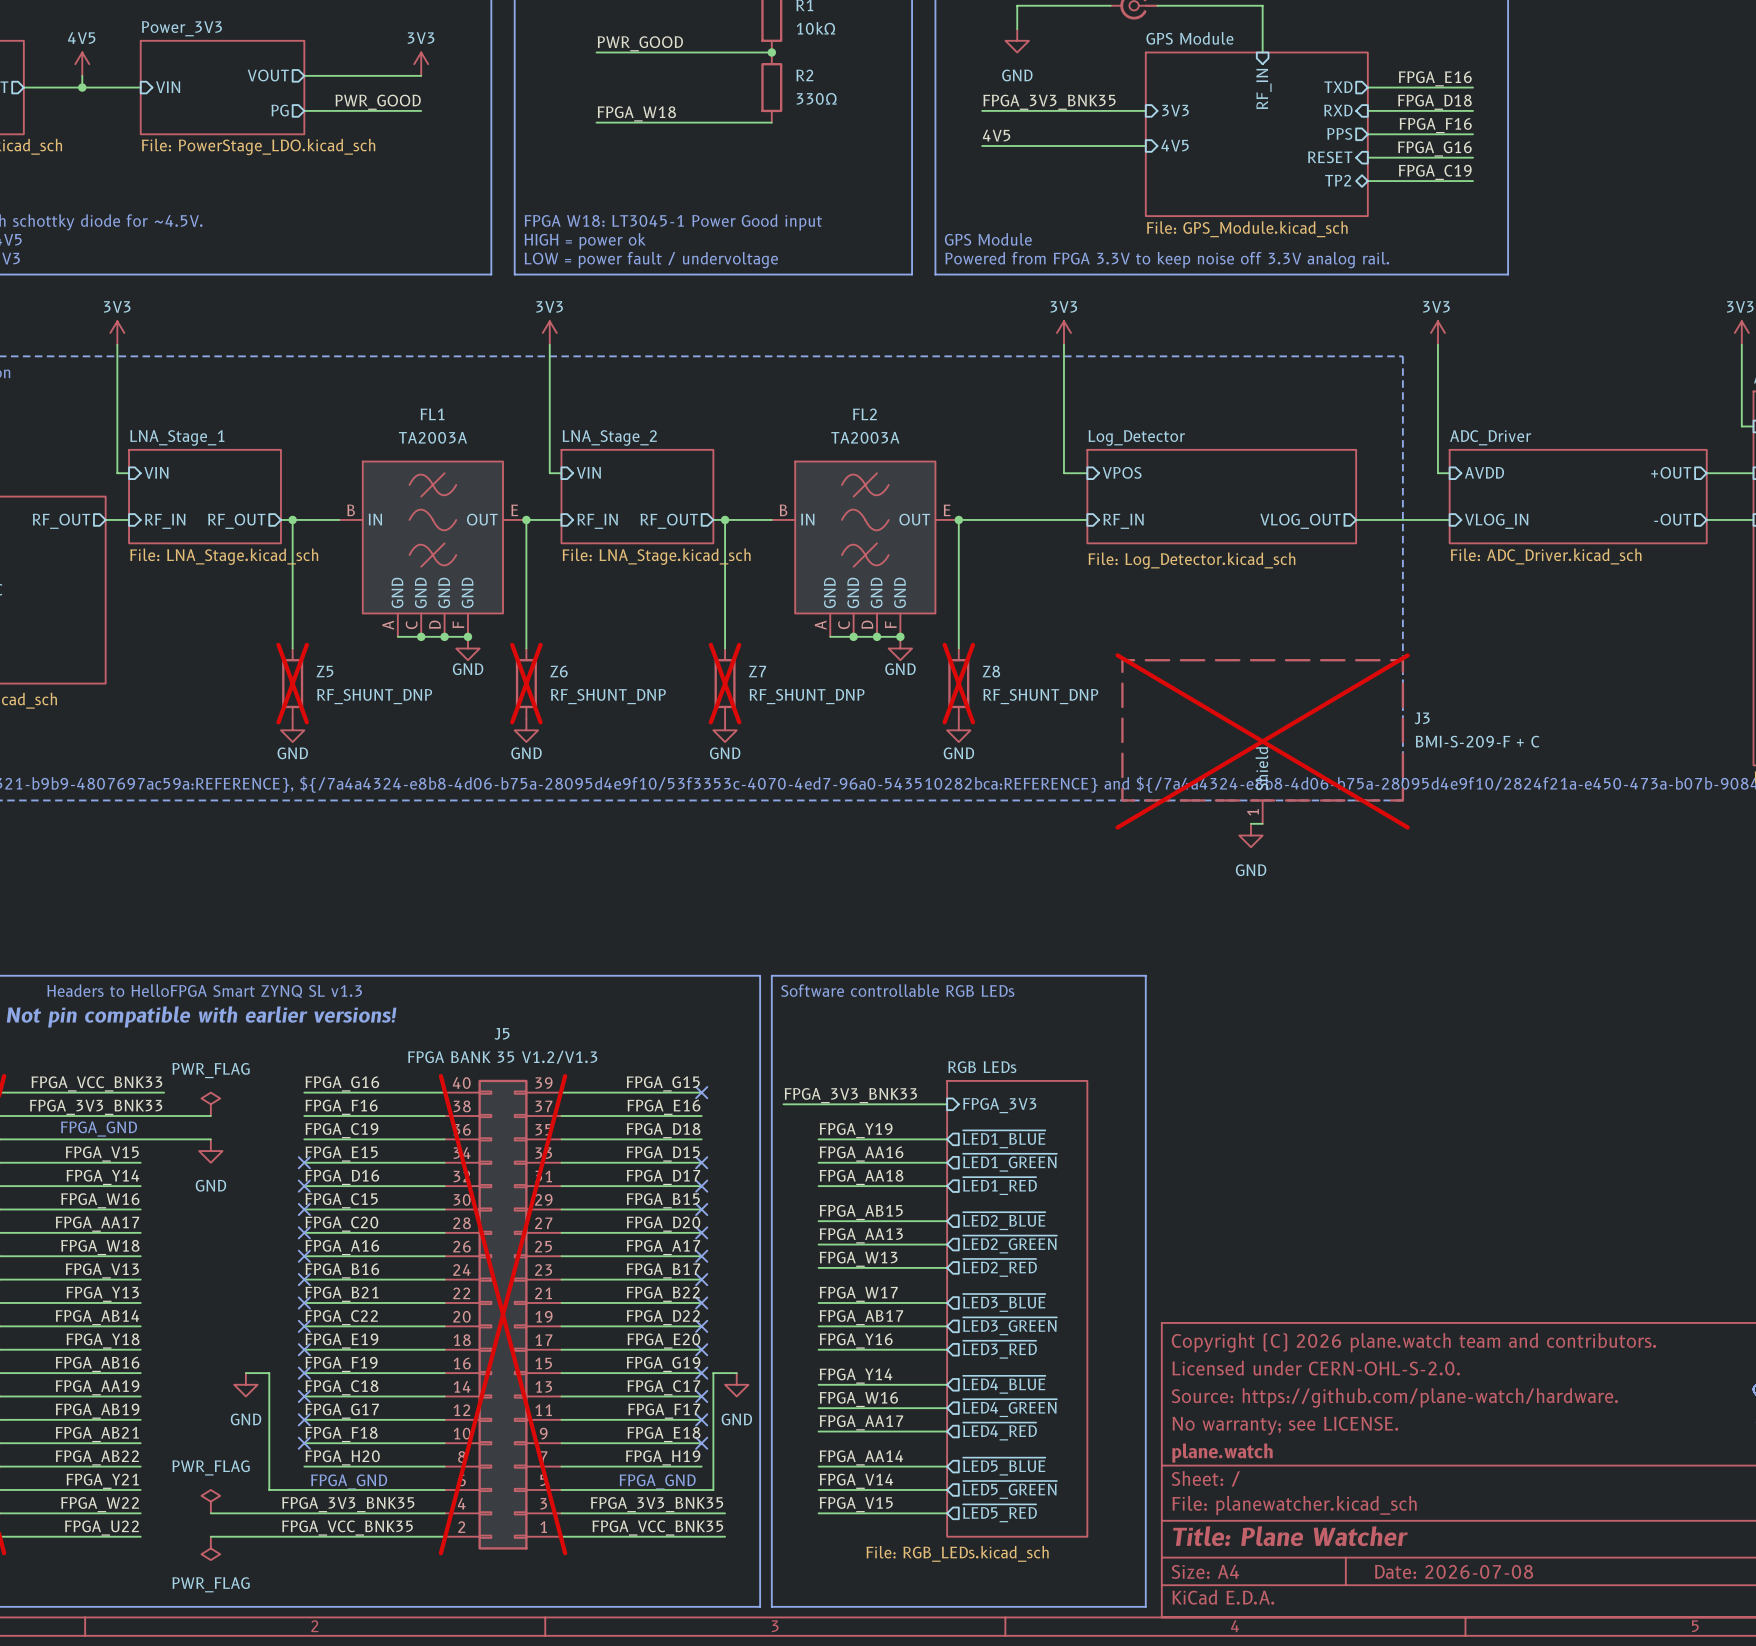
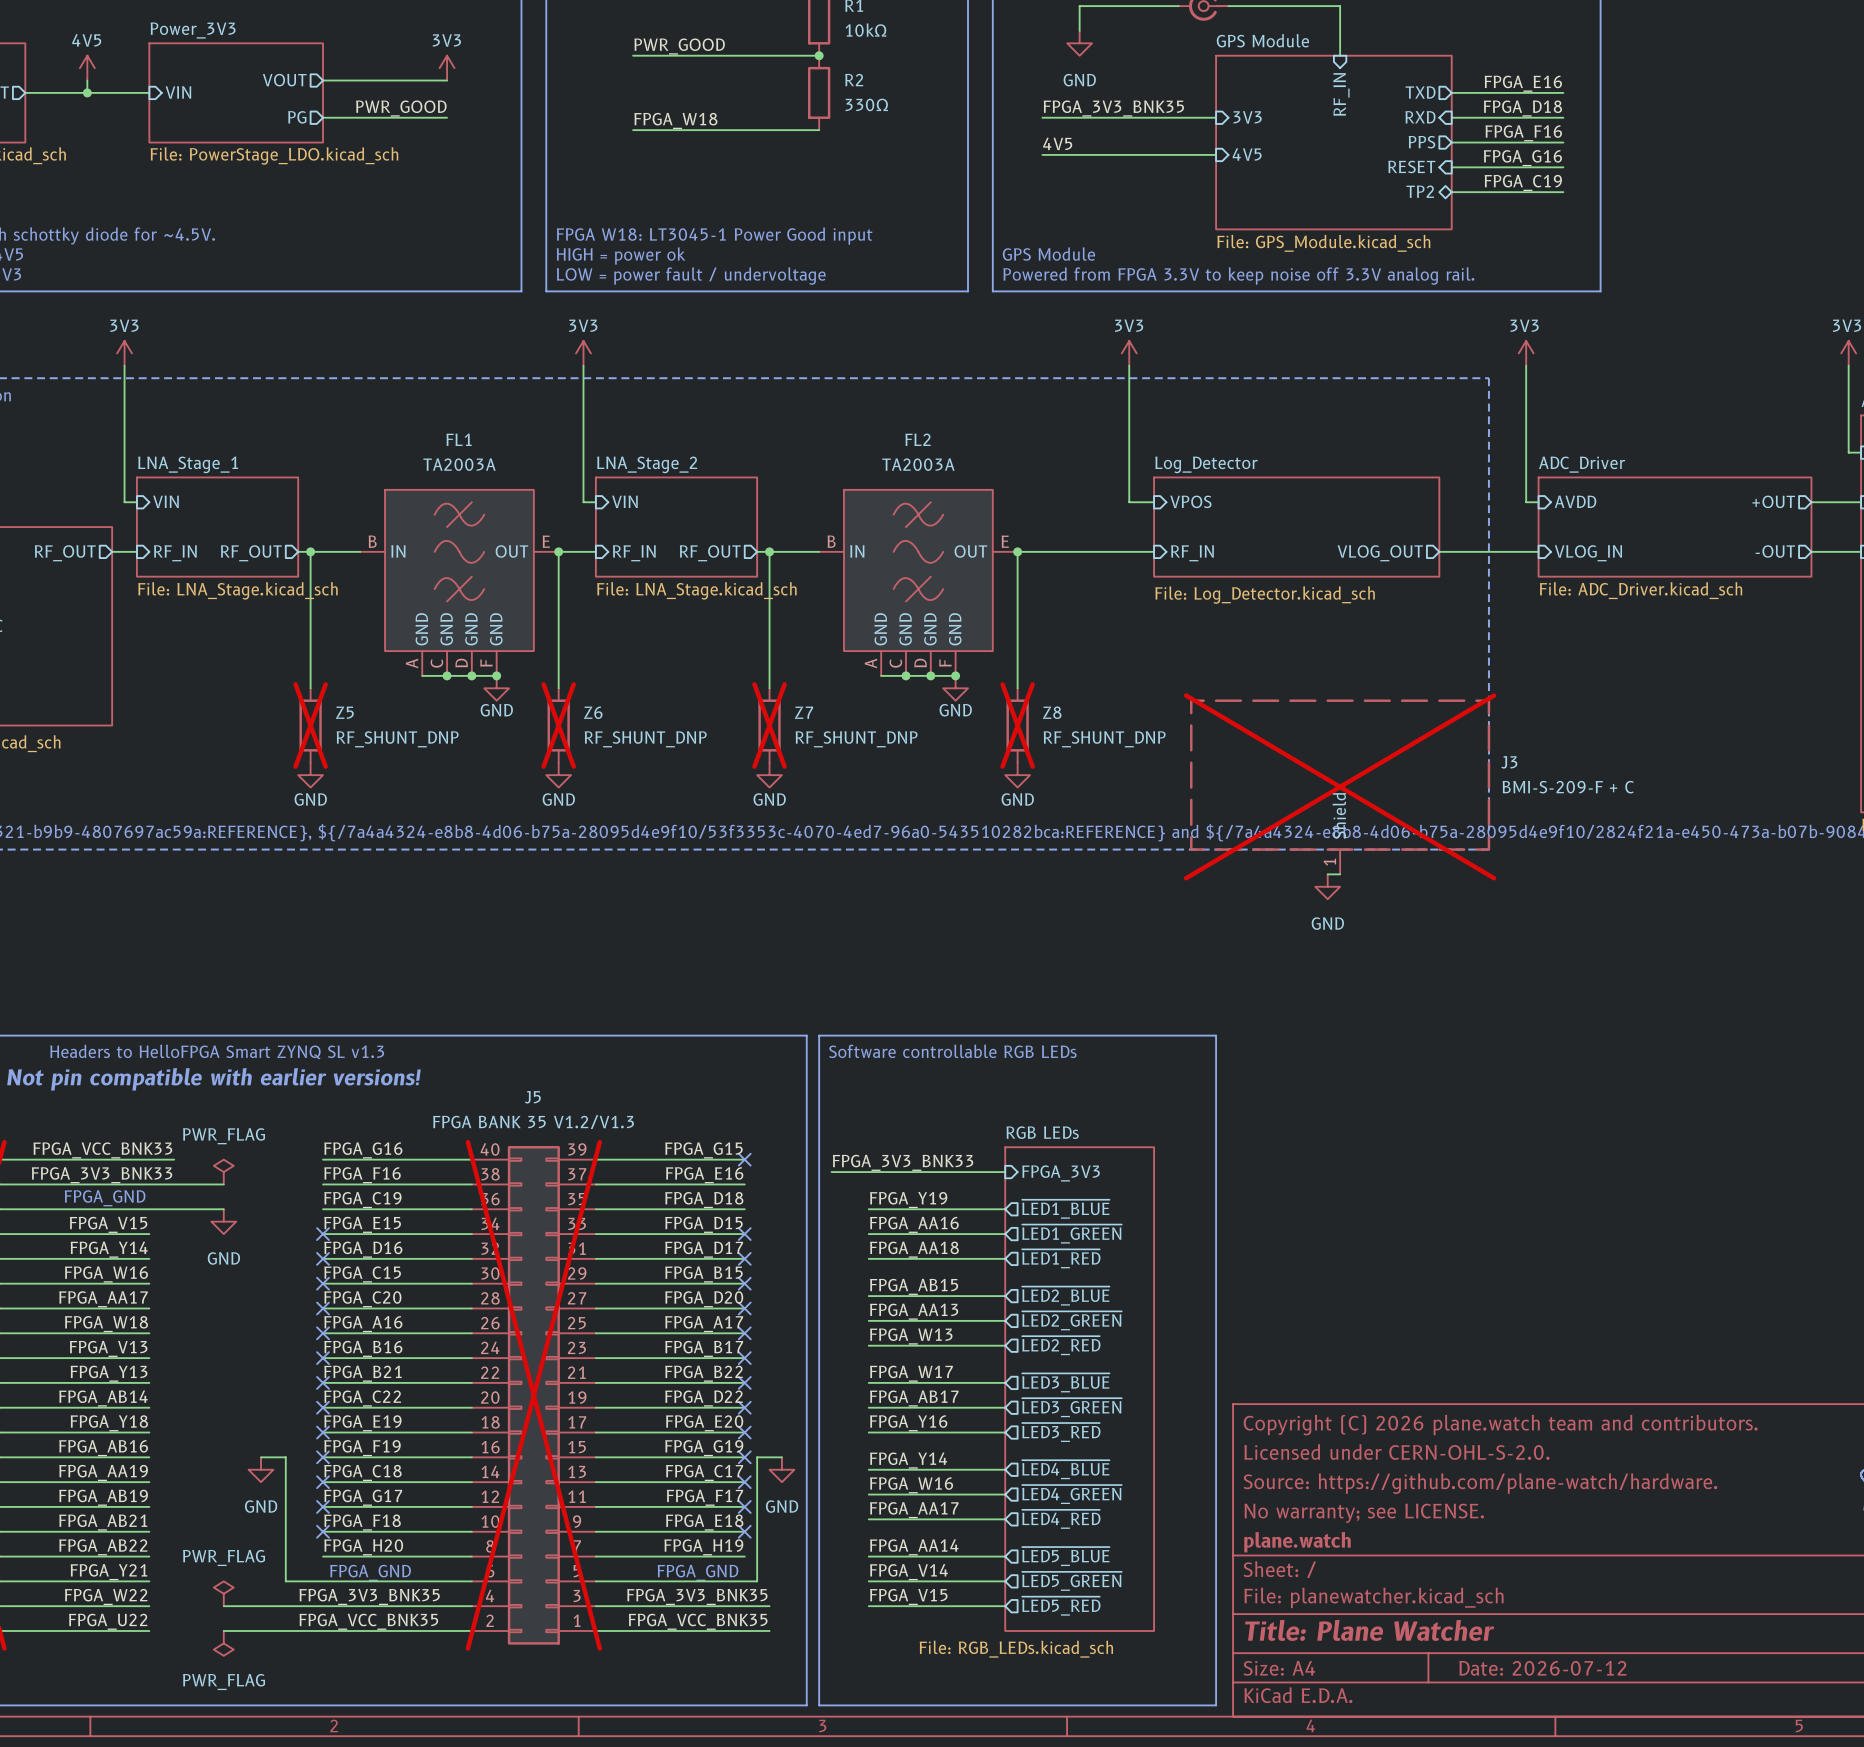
title block: Date: 2026-07-08 (1454, 1571) -> Date: 2026-07-12 (1542, 1668)

